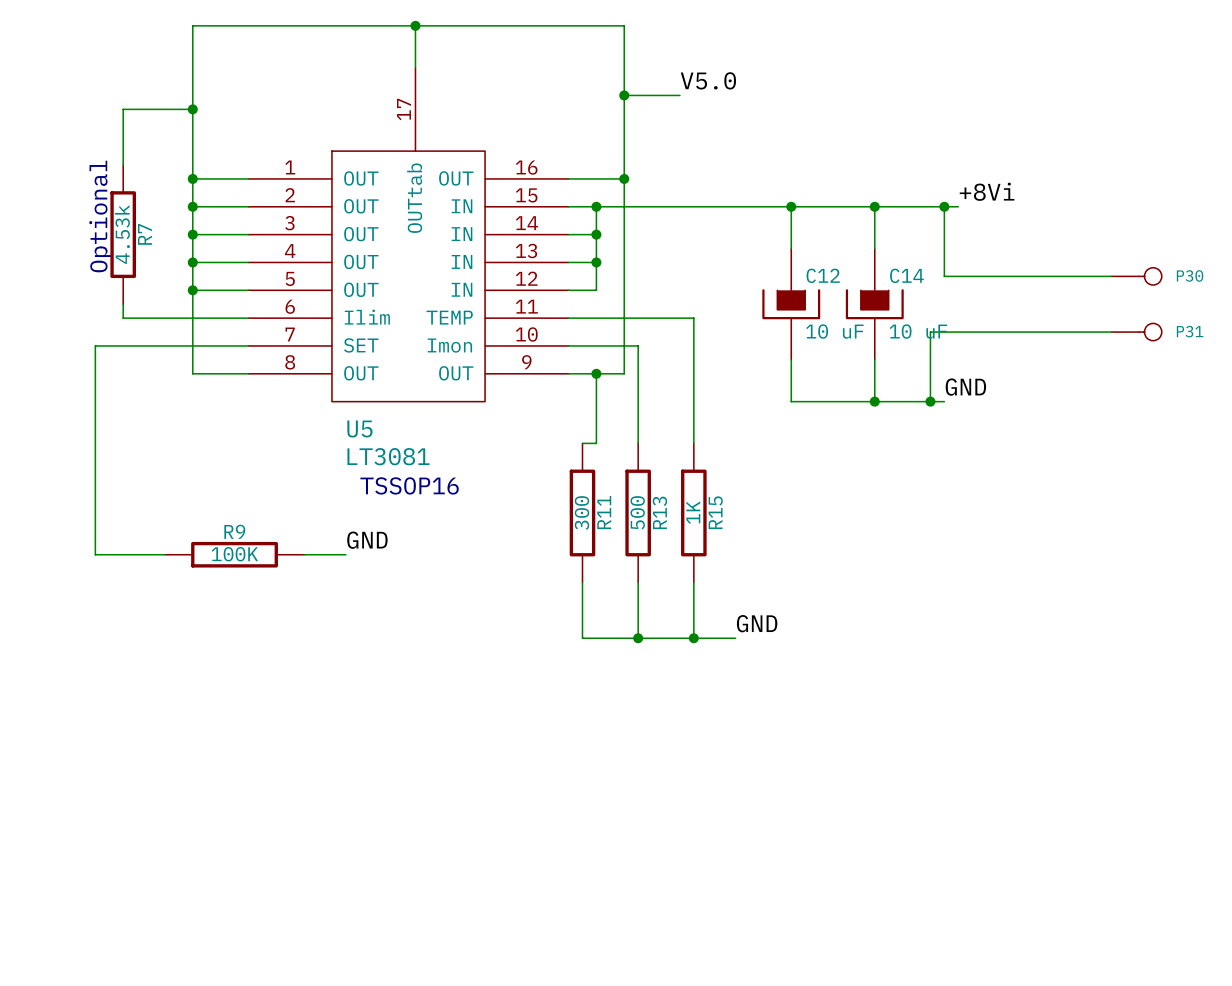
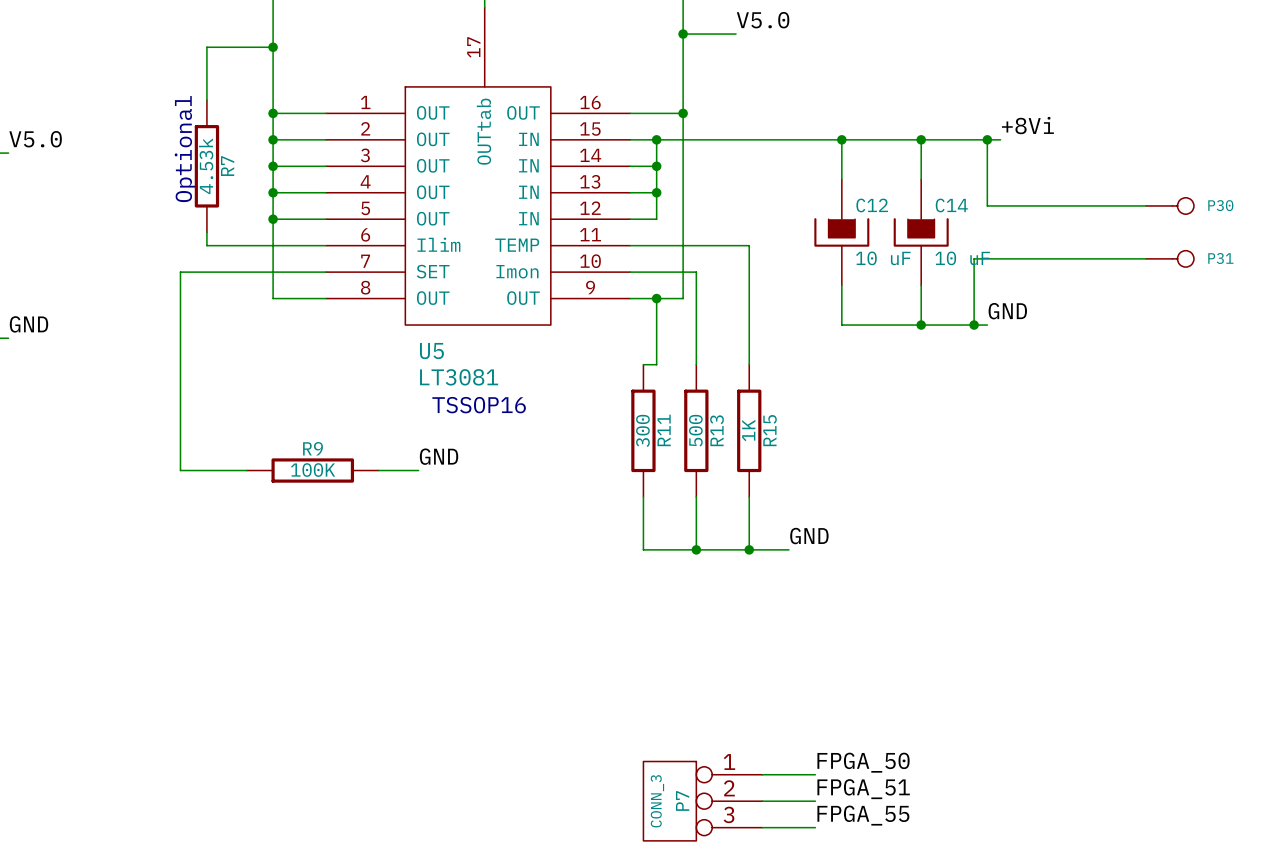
label: none -> FPGA_50 (863, 762)
wire: none -> (762, 774) (815, 774)
label: none -> FPGA_51 (863, 789)
P7: none -> CONN_3 (702, 801)
wire: none -> (762, 801) (815, 801)
label: none -> FPGA_55 (863, 815)
wire: none -> (762, 827) (815, 827)

